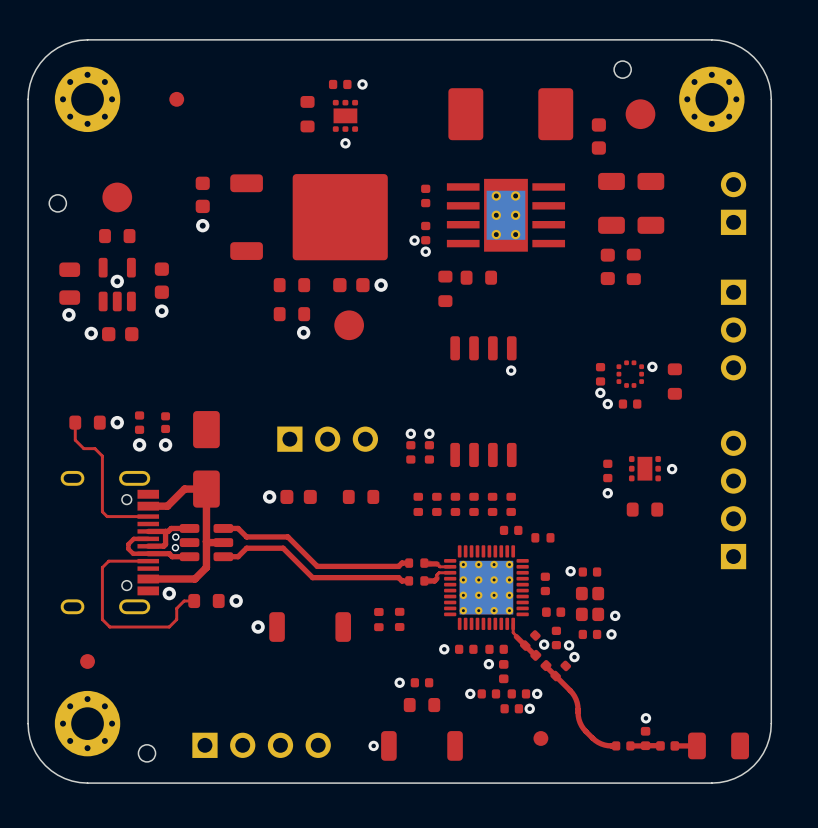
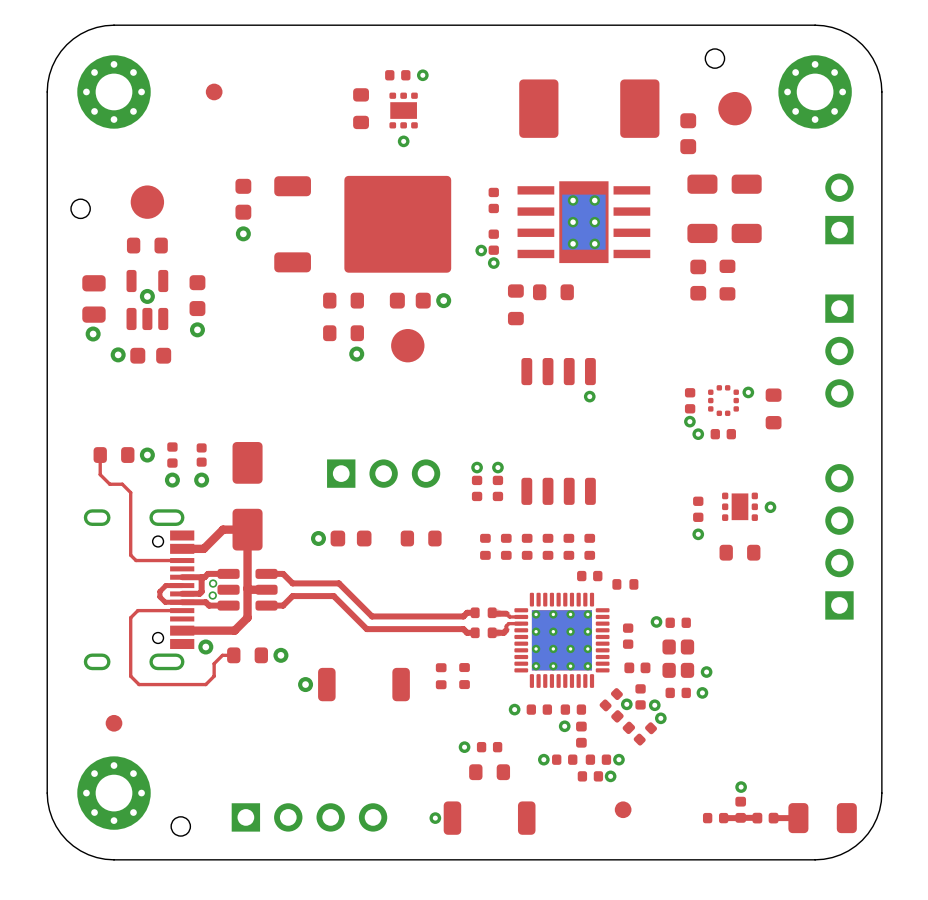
top track: (513, 623) (513, 632) (535, 655) -> none
top track: (545, 665) (574, 696) (578, 719) (583, 728) (598, 742) (616, 745) -> none

